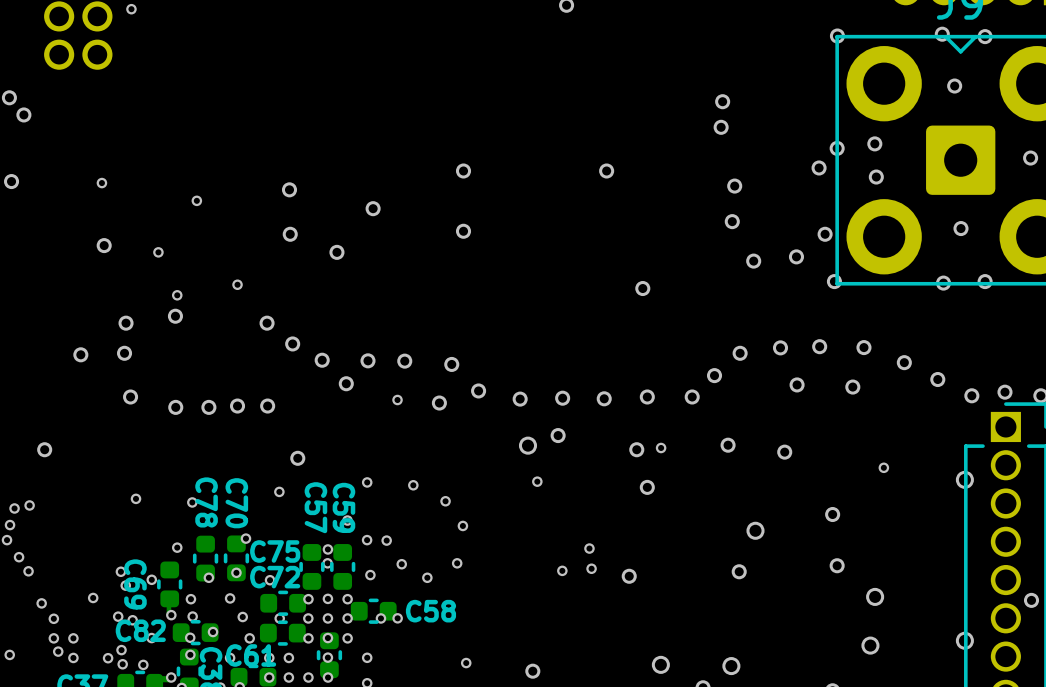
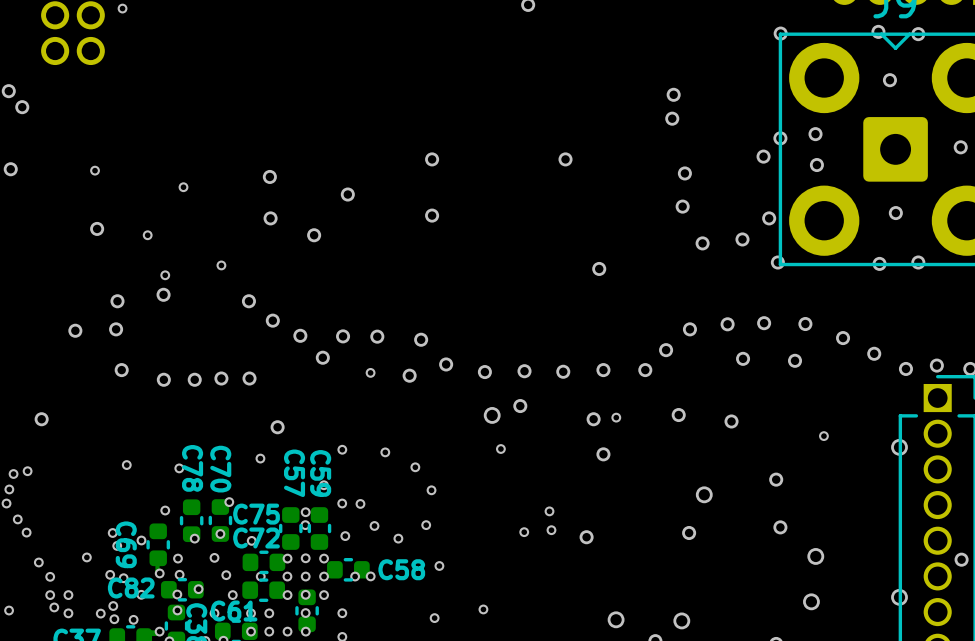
via: none -> (439, 565)
via: none -> (483, 609)
via: (532, 671) -> none

